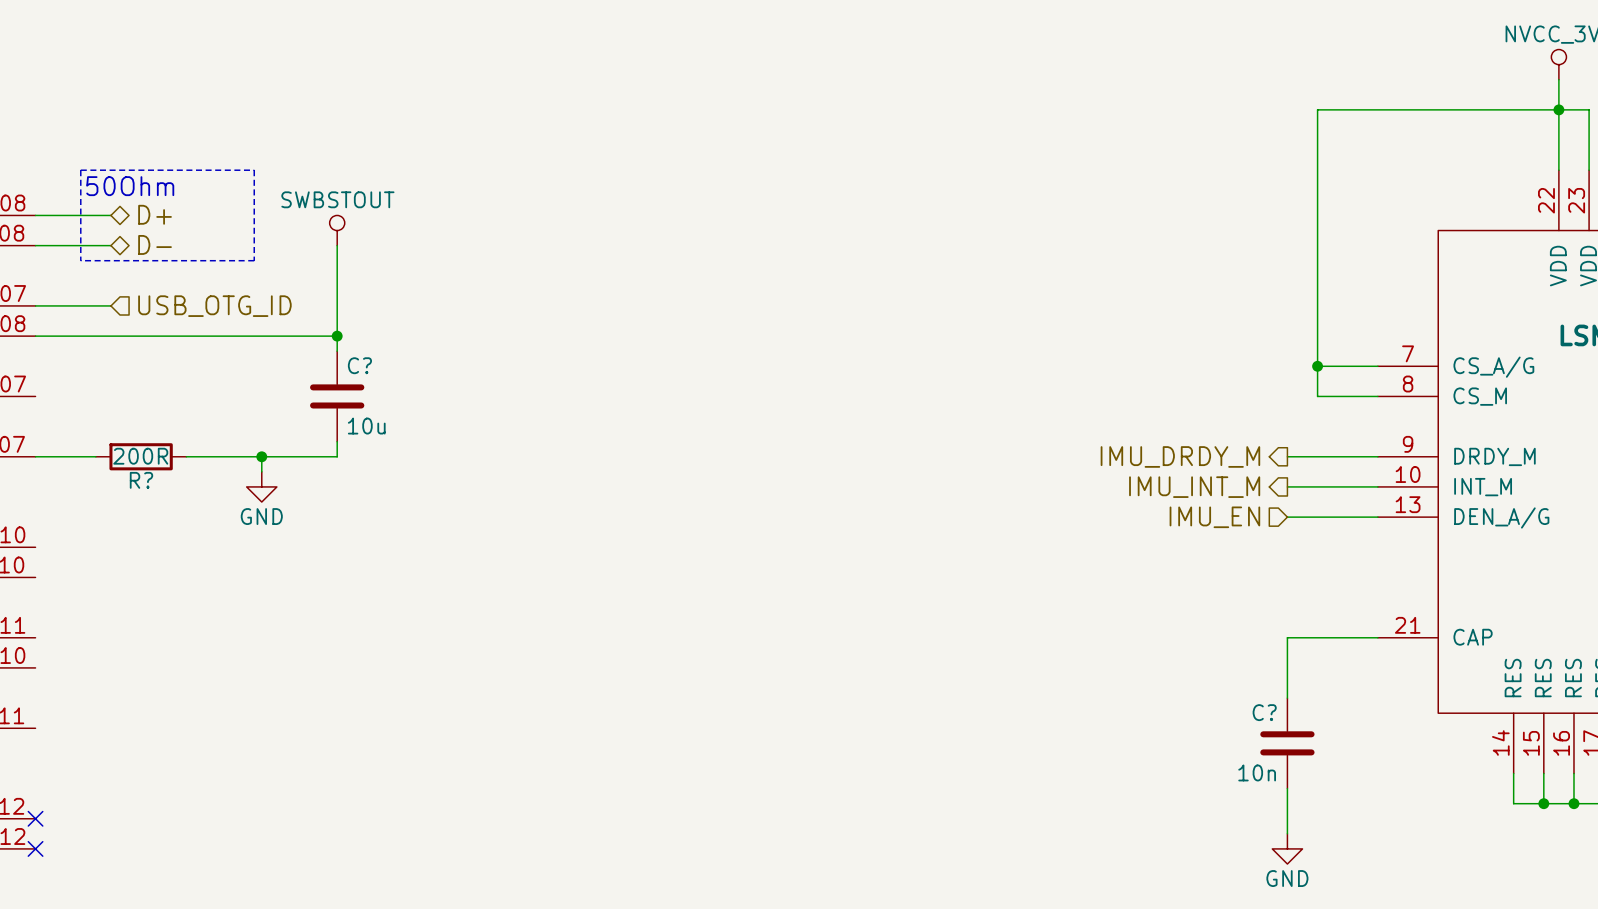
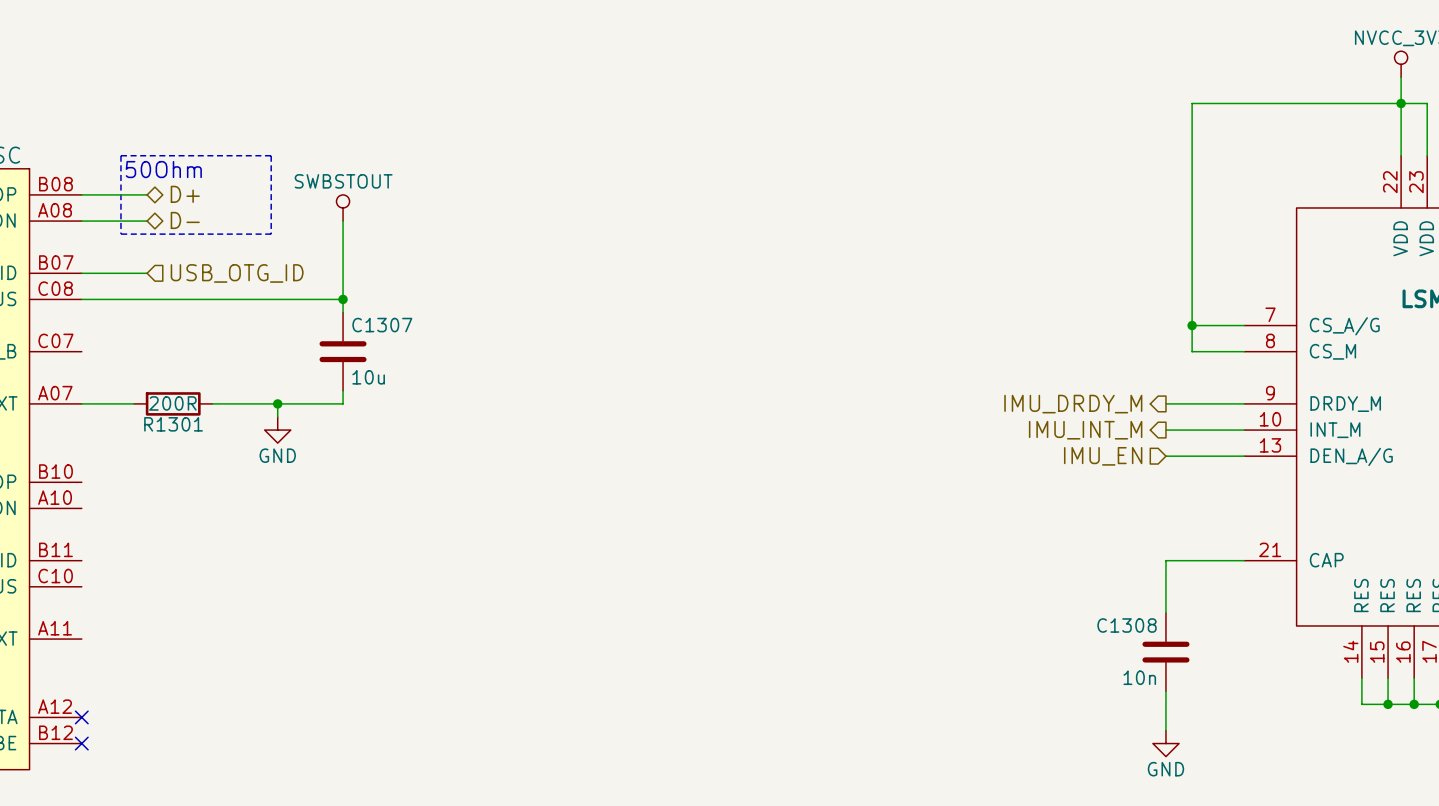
C? name: C? (359, 365) -> C1307 (382, 325)
R? name: R? (141, 480) -> R1301 (173, 424)
C? name: C? (1264, 712) -> C1308 (1127, 625)

